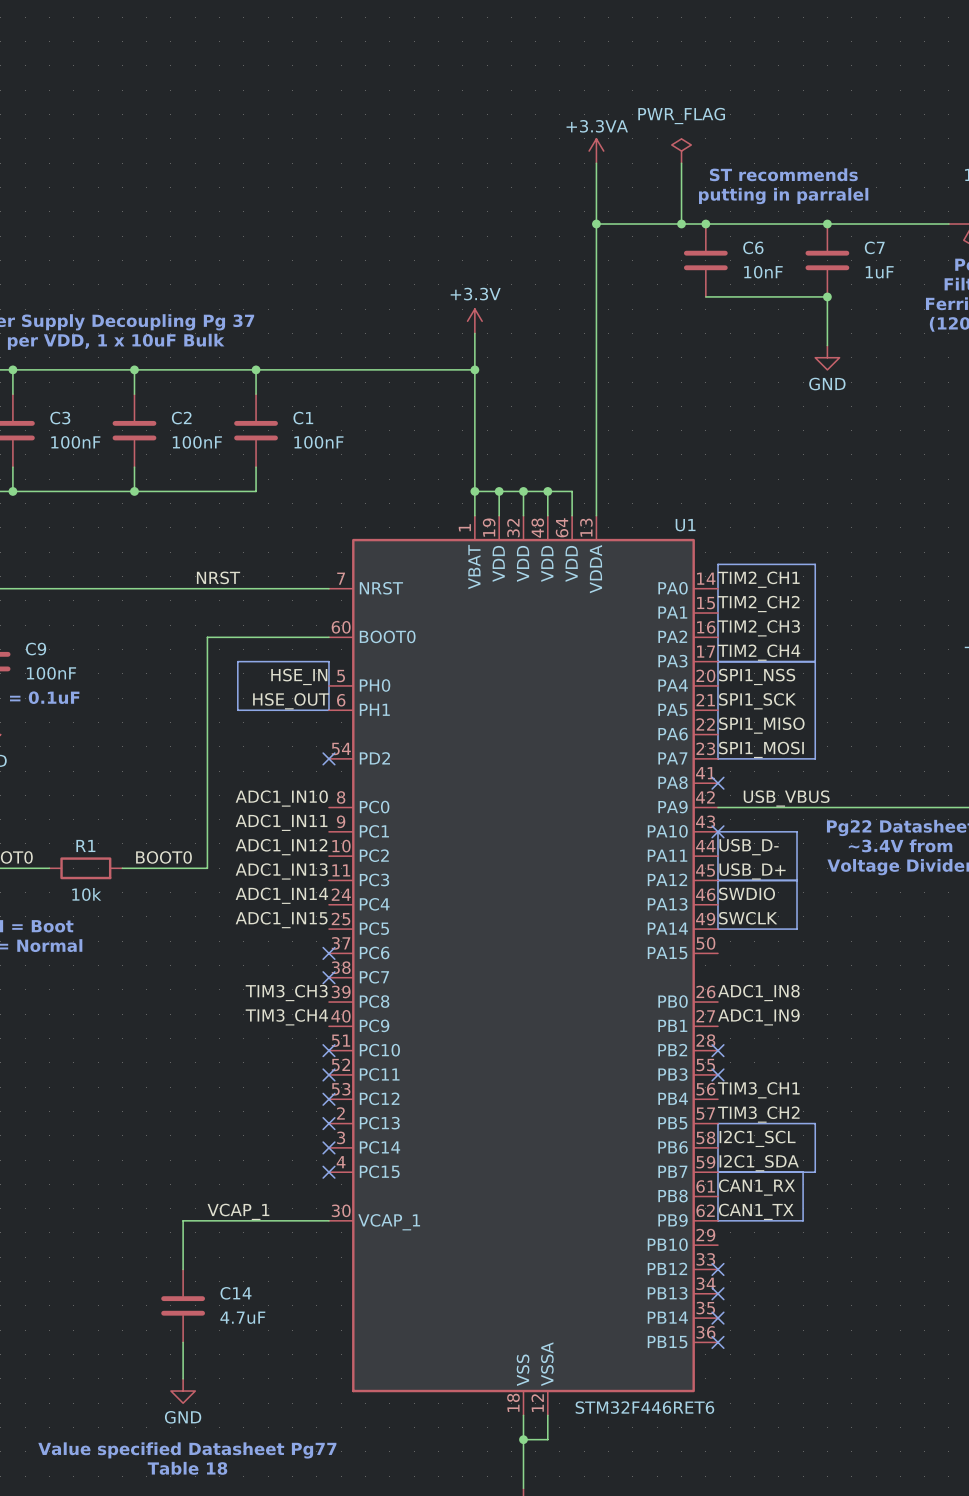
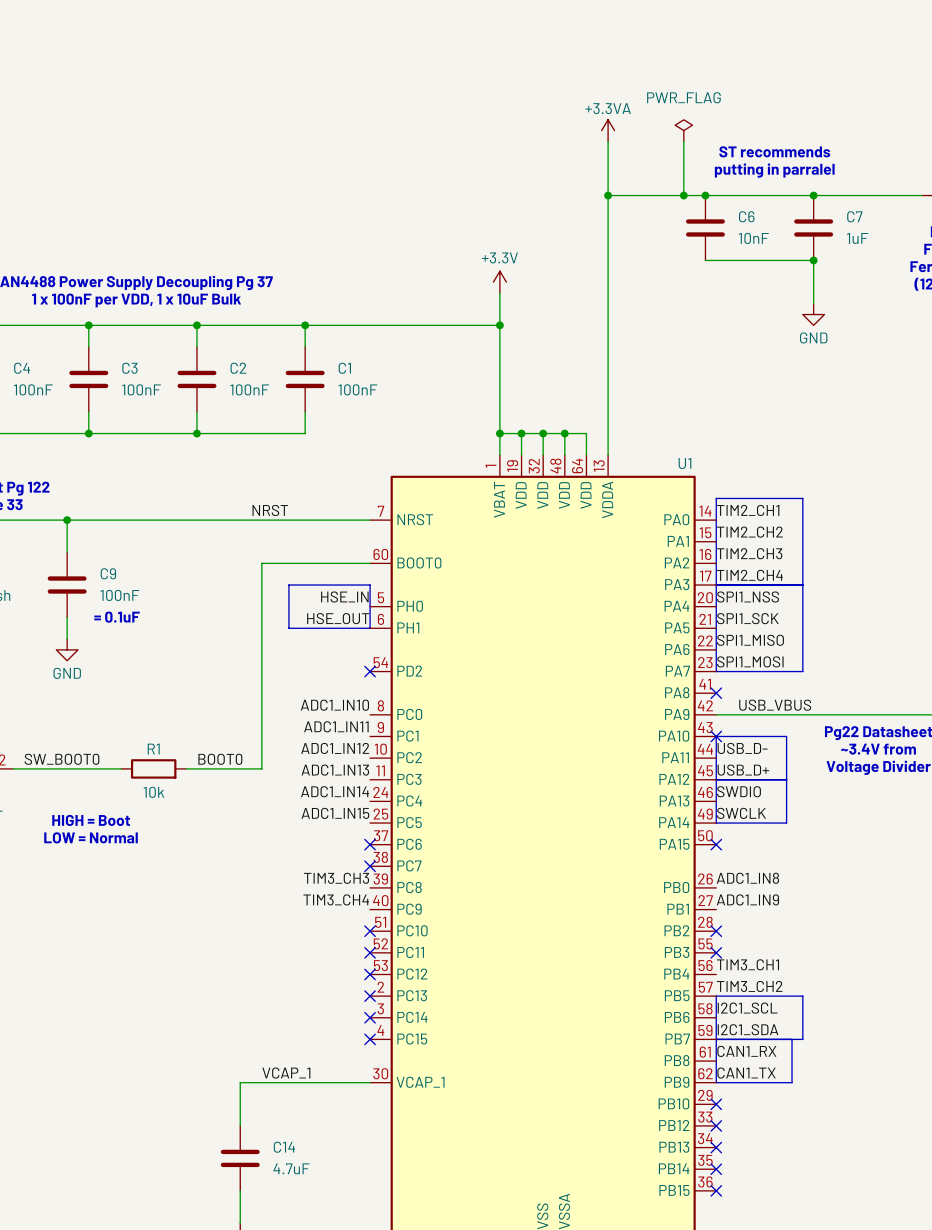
no-connect mark: none -> (716, 844)
no-connect mark: none -> (716, 1104)

